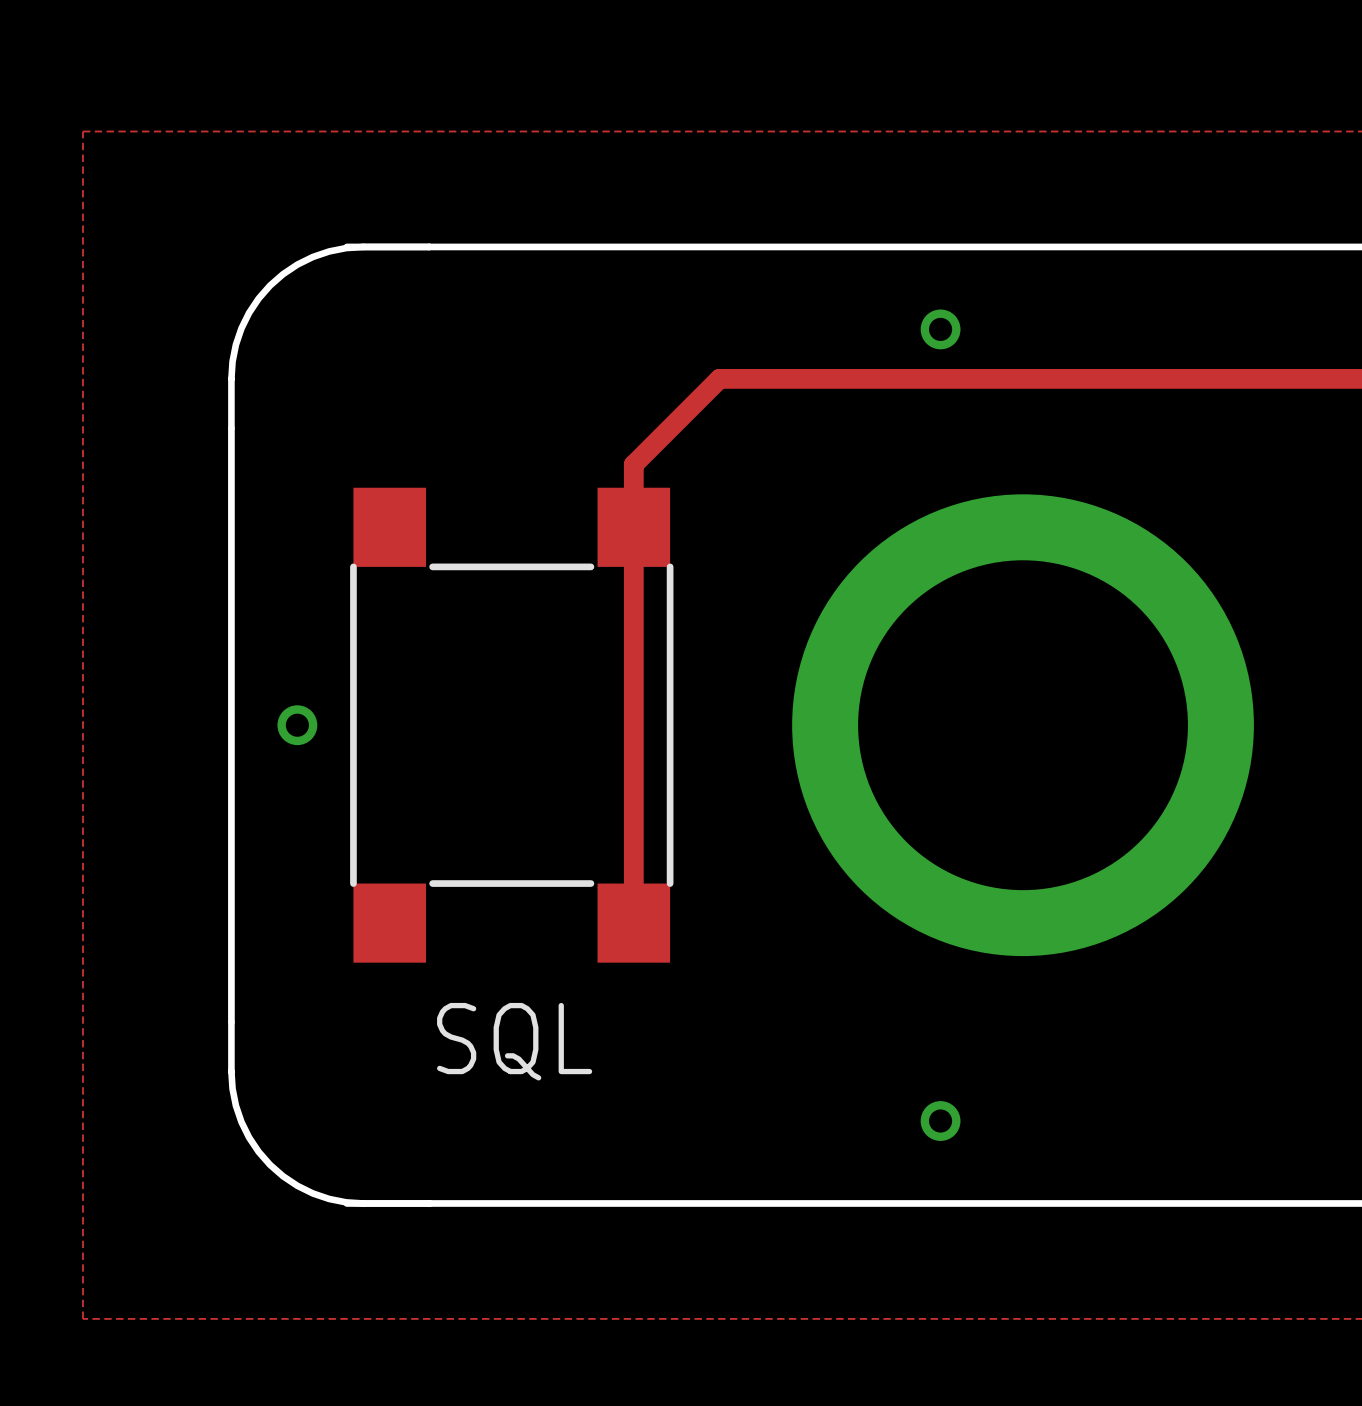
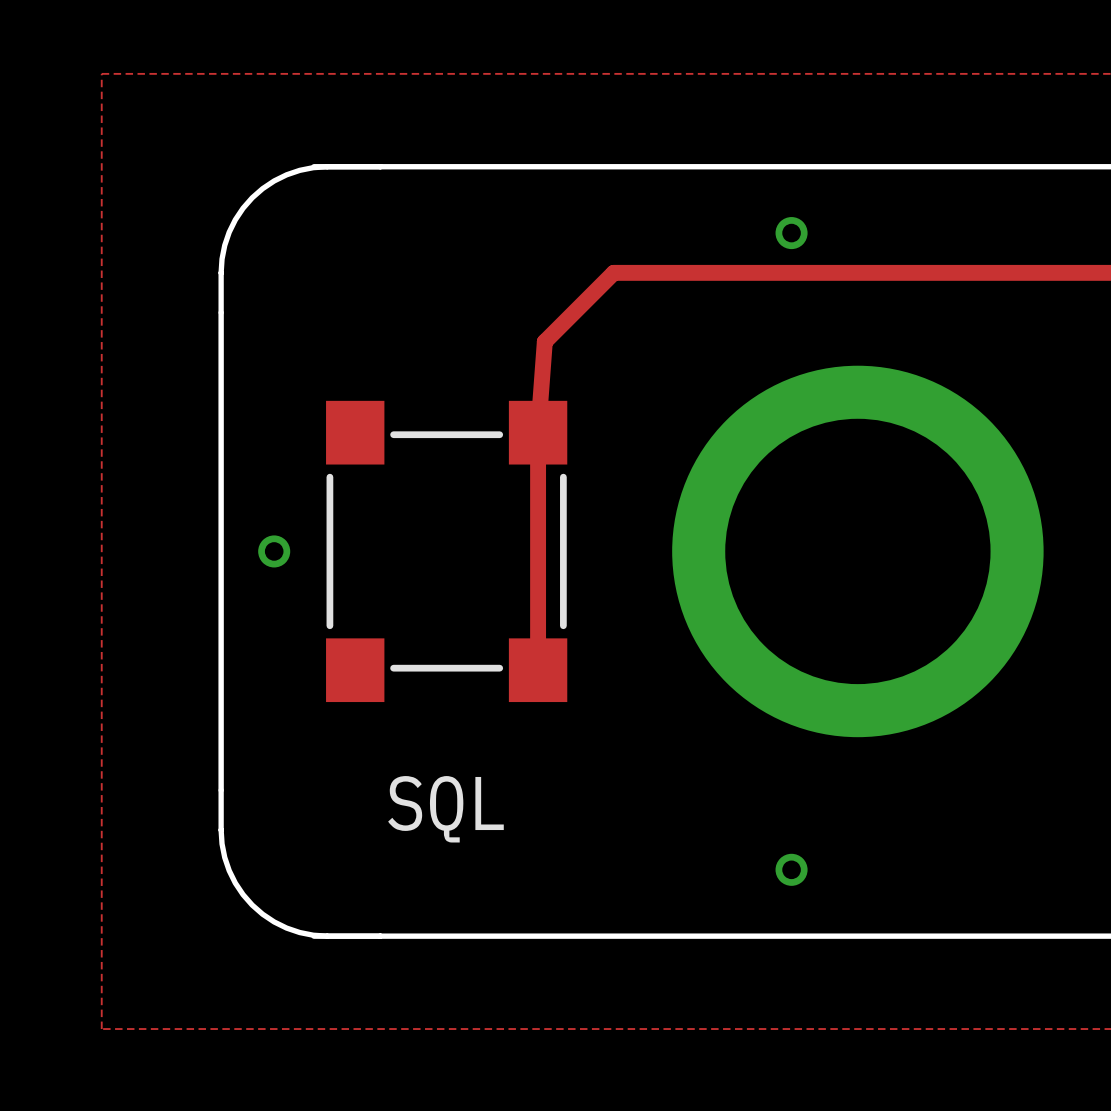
track: (633, 464) (633, 923) -> (544, 341) (538, 432) (538, 670)
SQL footprint: [350, 487, 674, 963] -> [326, 400, 568, 703]

